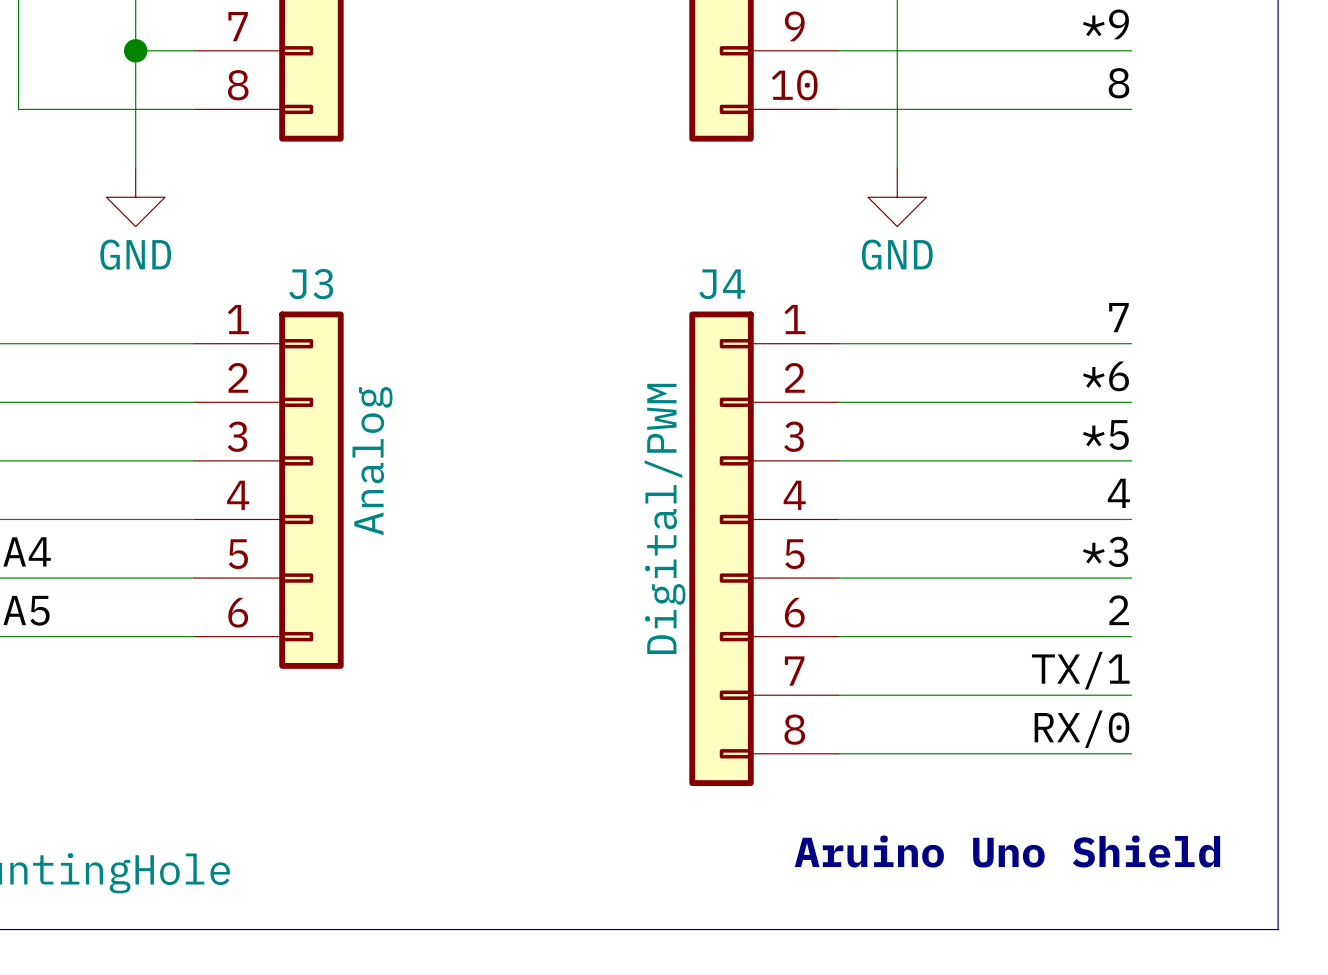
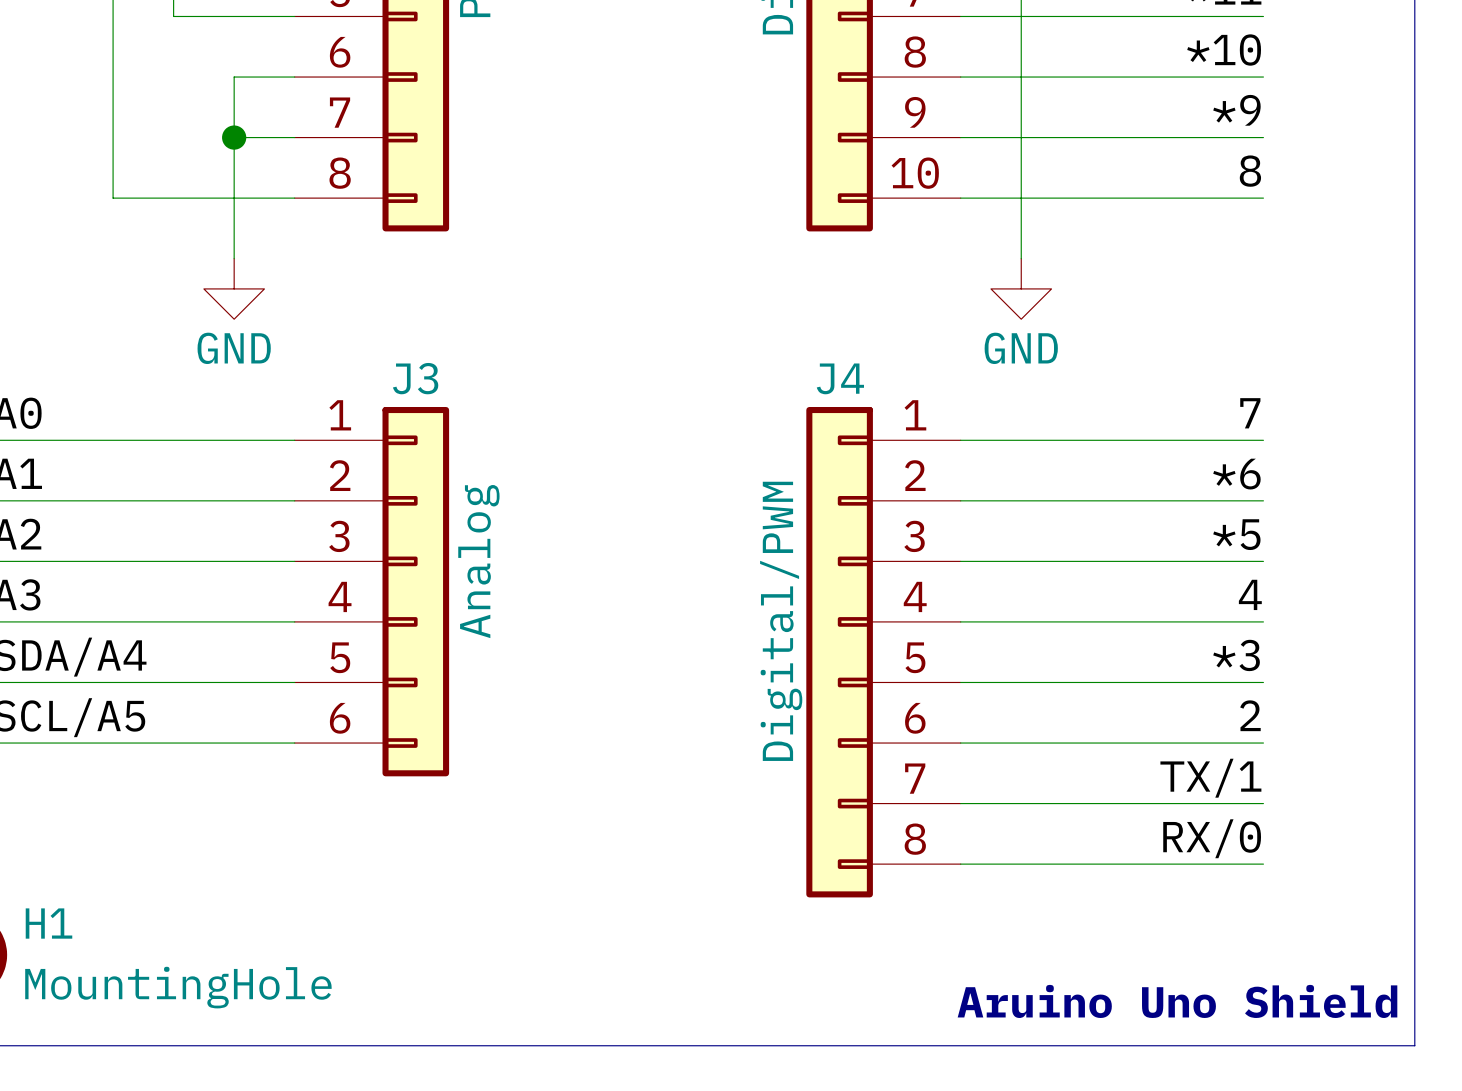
text position: Aruino Uno Shield (1007, 851) -> Aruino Uno Shield (1177, 1001)

